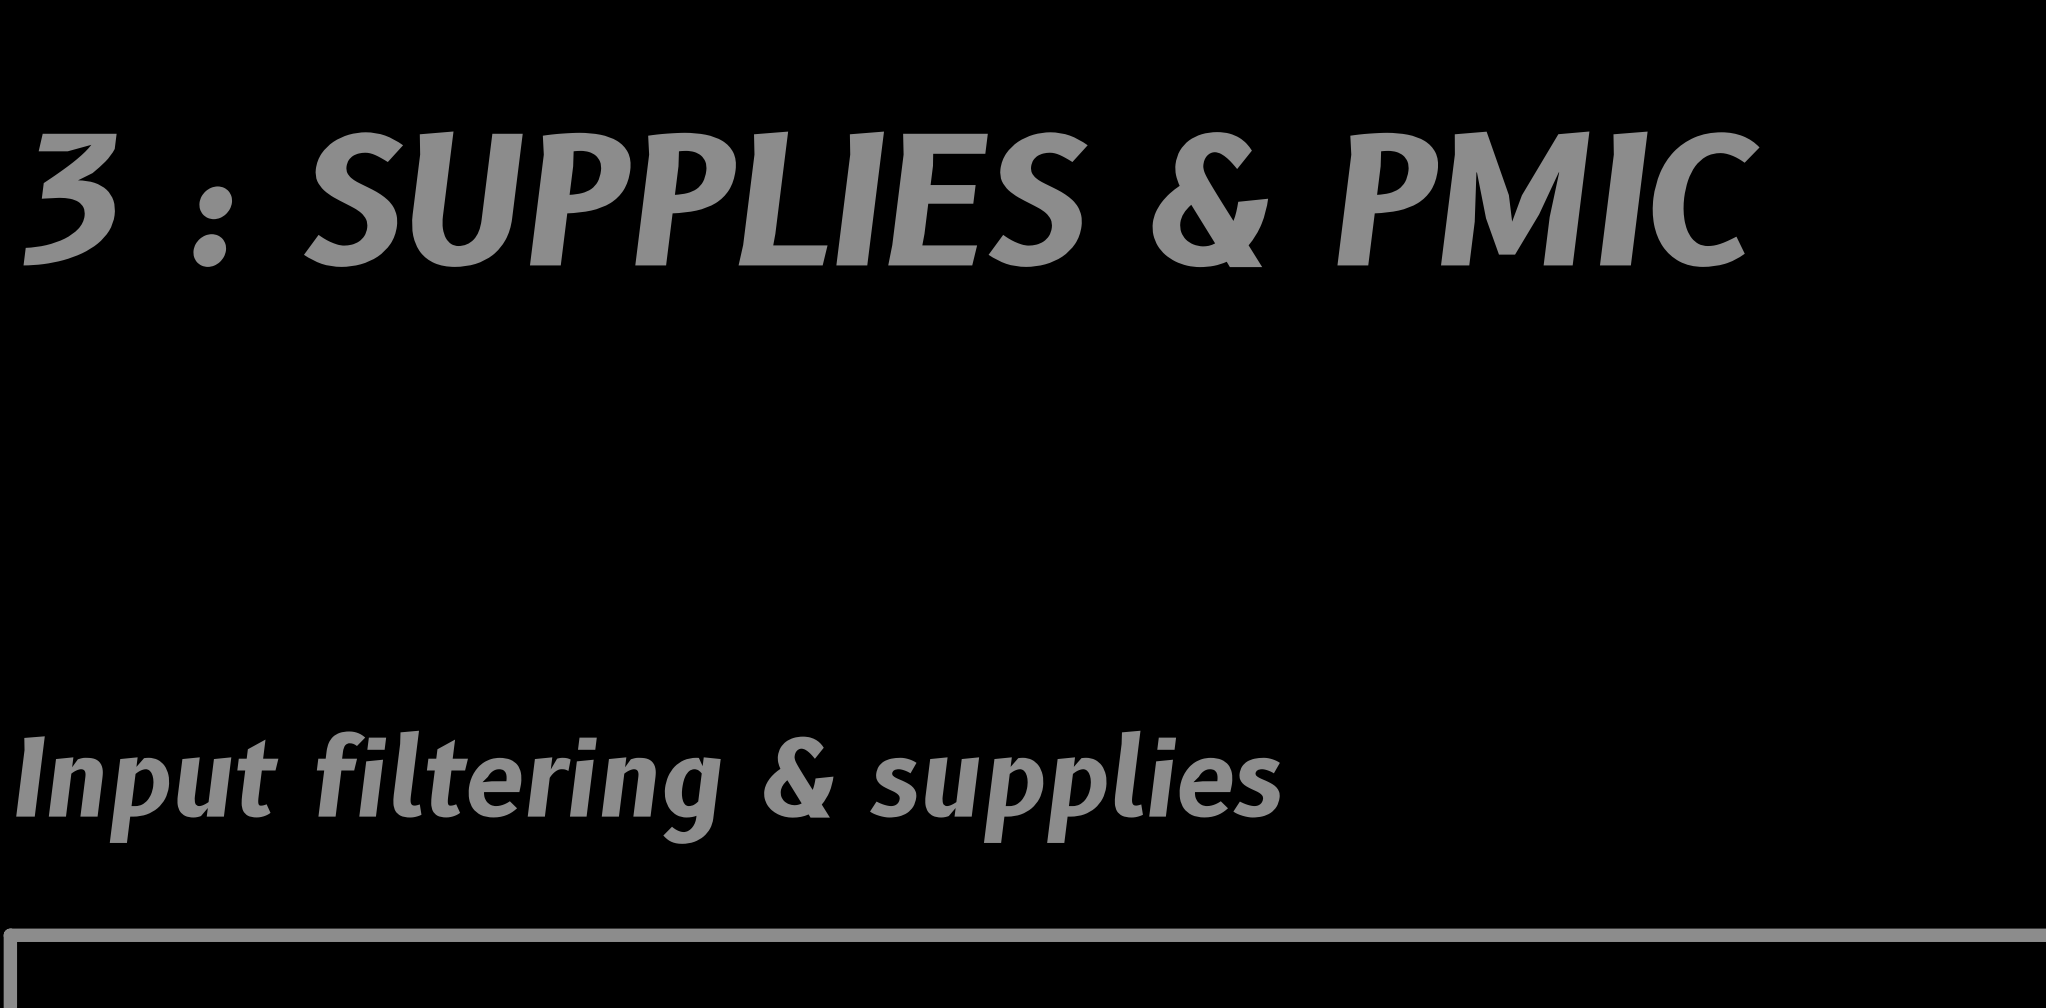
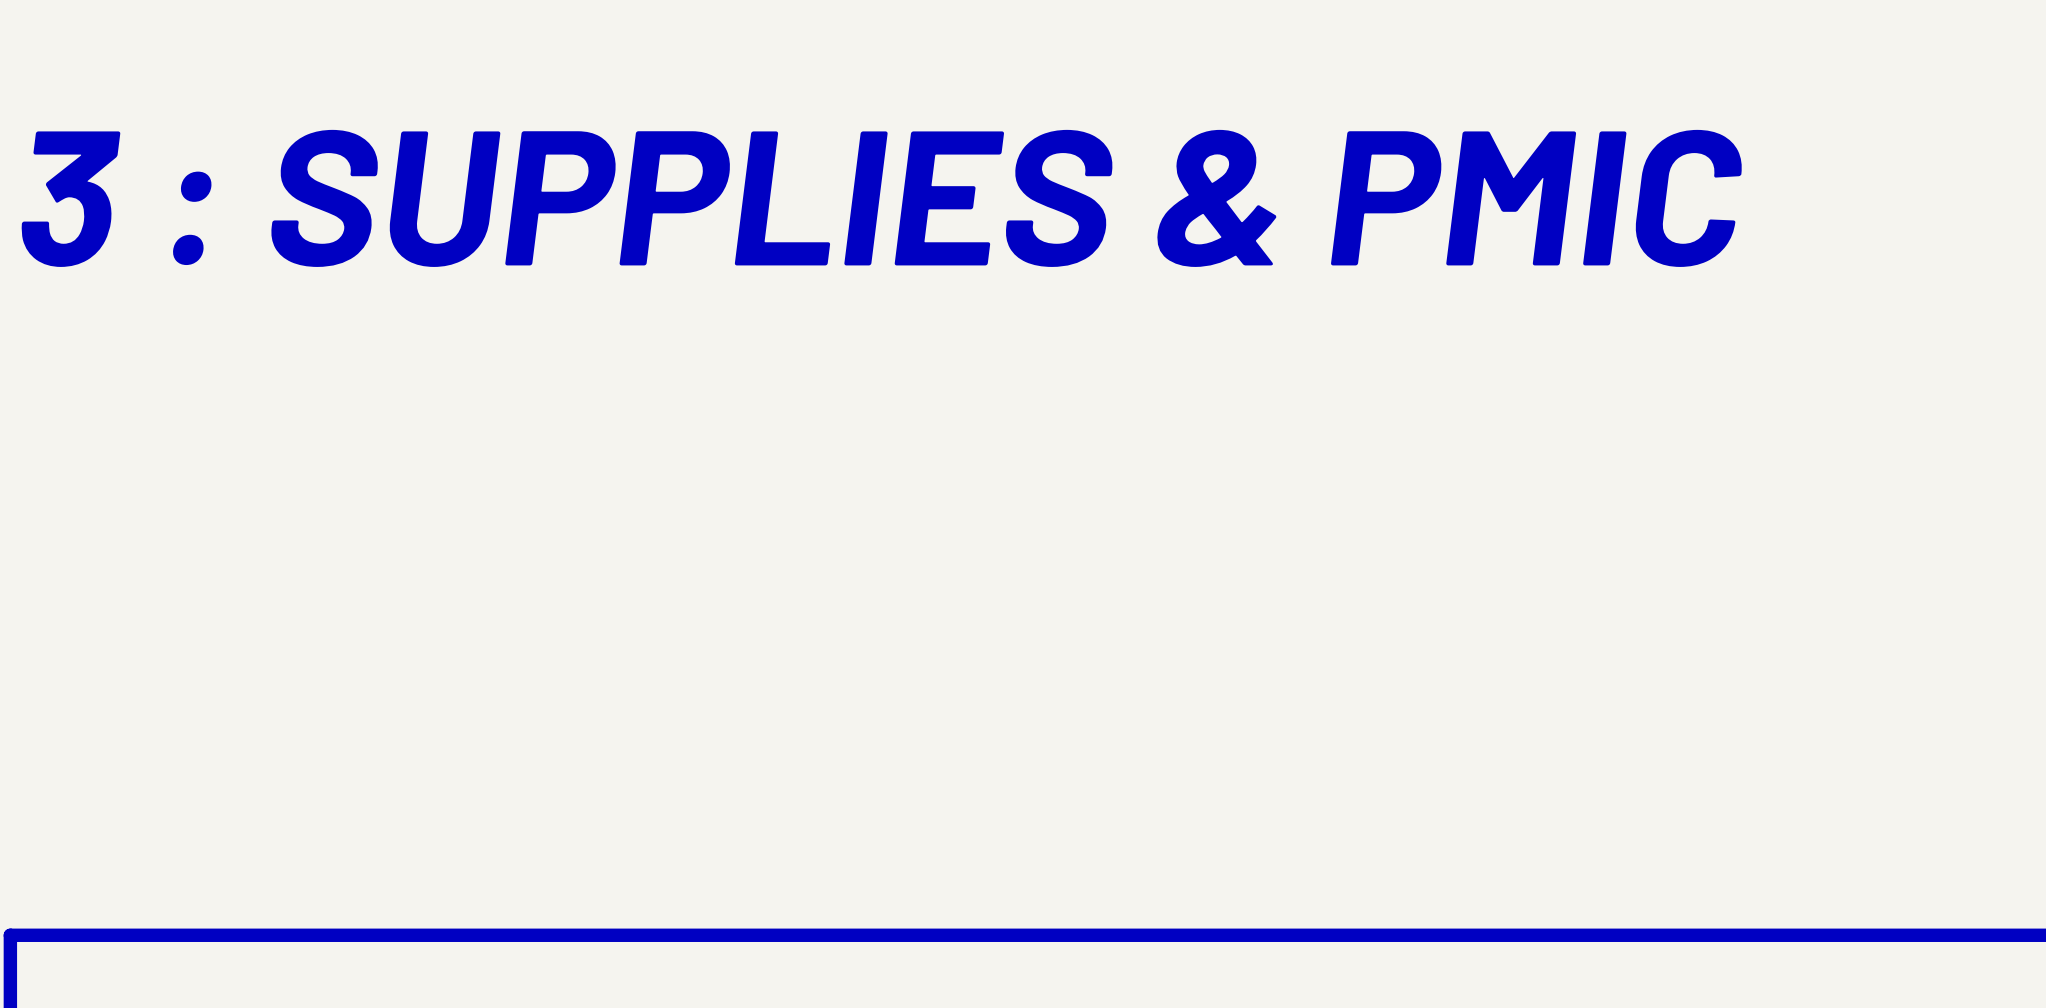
text: Input filtering & supplies (648, 787) -> none

